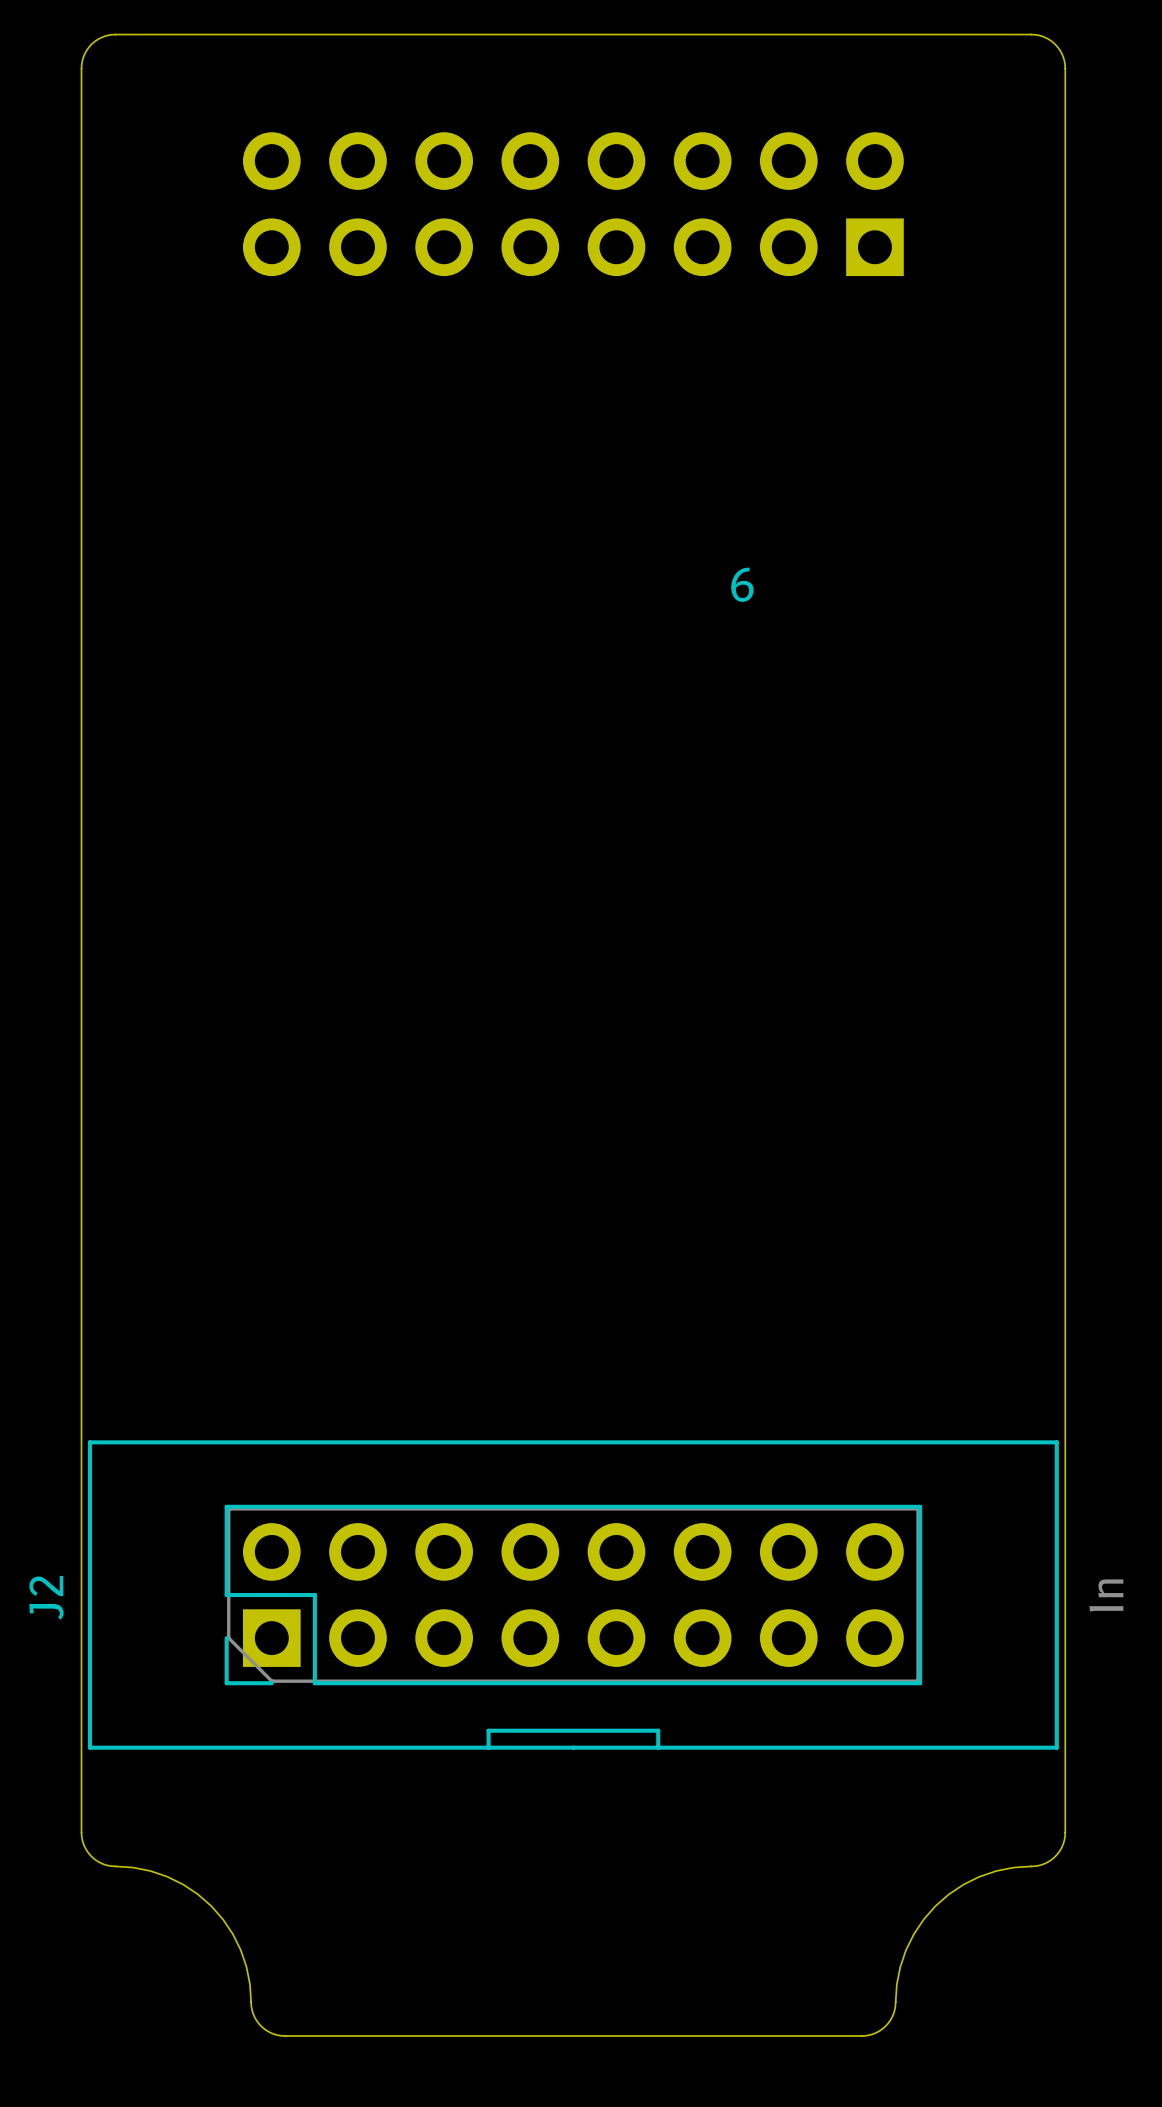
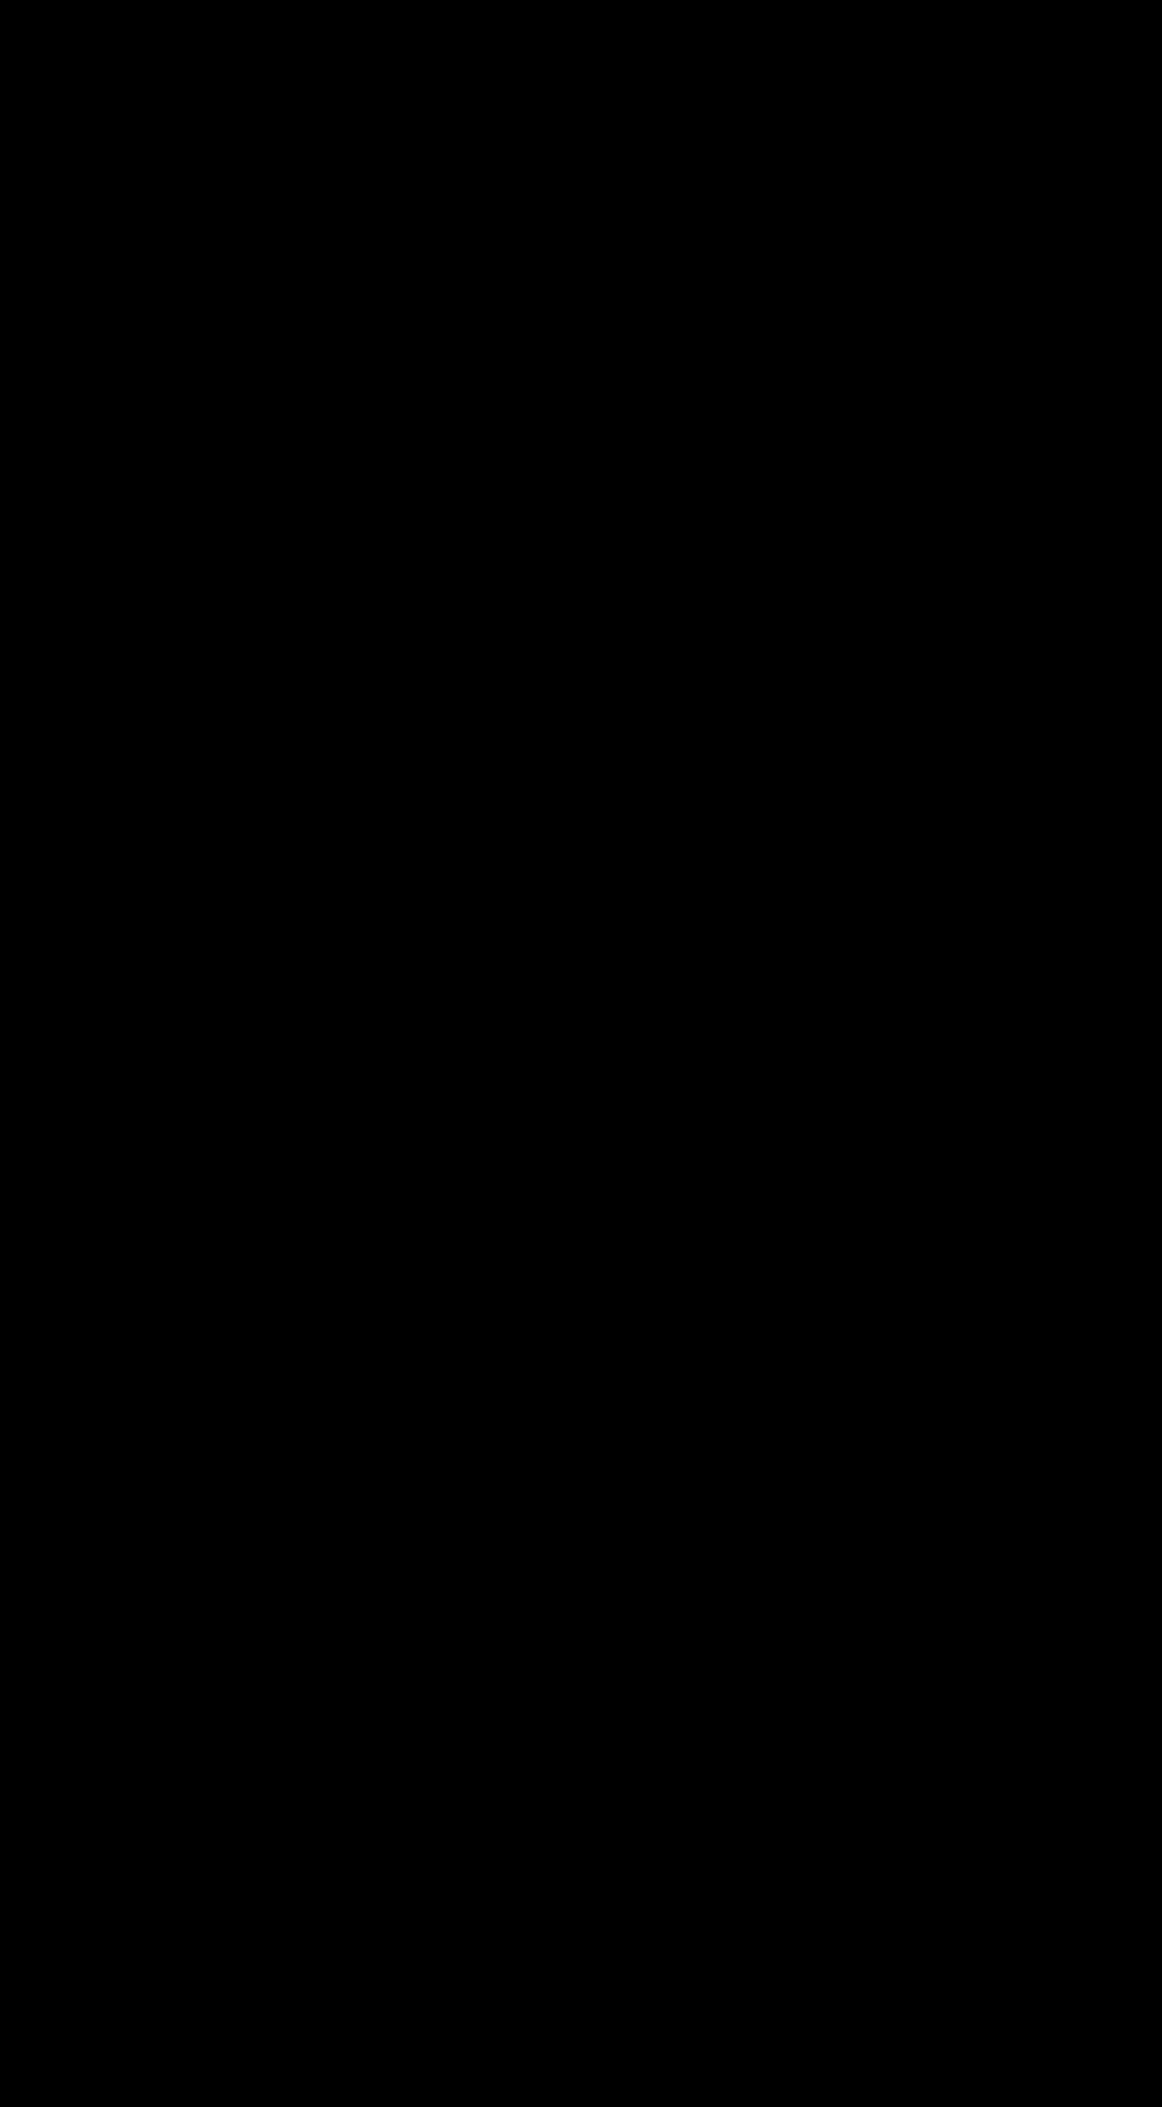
board edge: (115, 34) (1031, 34) (1042, 36) (1052, 41) (1063, 57) (1065, 68) (1065, 1836) (1057, 1853) (1046, 1863) (996, 1871) (979, 1876) (963, 1884) (935, 1906) (913, 1934) (906, 1950) (900, 1966) (892, 2016) (885, 2026) (872, 2034) (861, 2036) (277, 2035) (263, 2028) (254, 2016) (246, 1966) (240, 1950) (232, 1934) (211, 1906) (183, 1884) (167, 1876) (150, 1871) (100, 1863) (91, 1856) (83, 1843) (81, 1832) (81, 68) (84, 53) (91, 44) (100, 37) (115, 34) -> none
part: (573, 204) -> none
text: 6 (742, 584) -> none
J2: In (573, 1595) -> none

